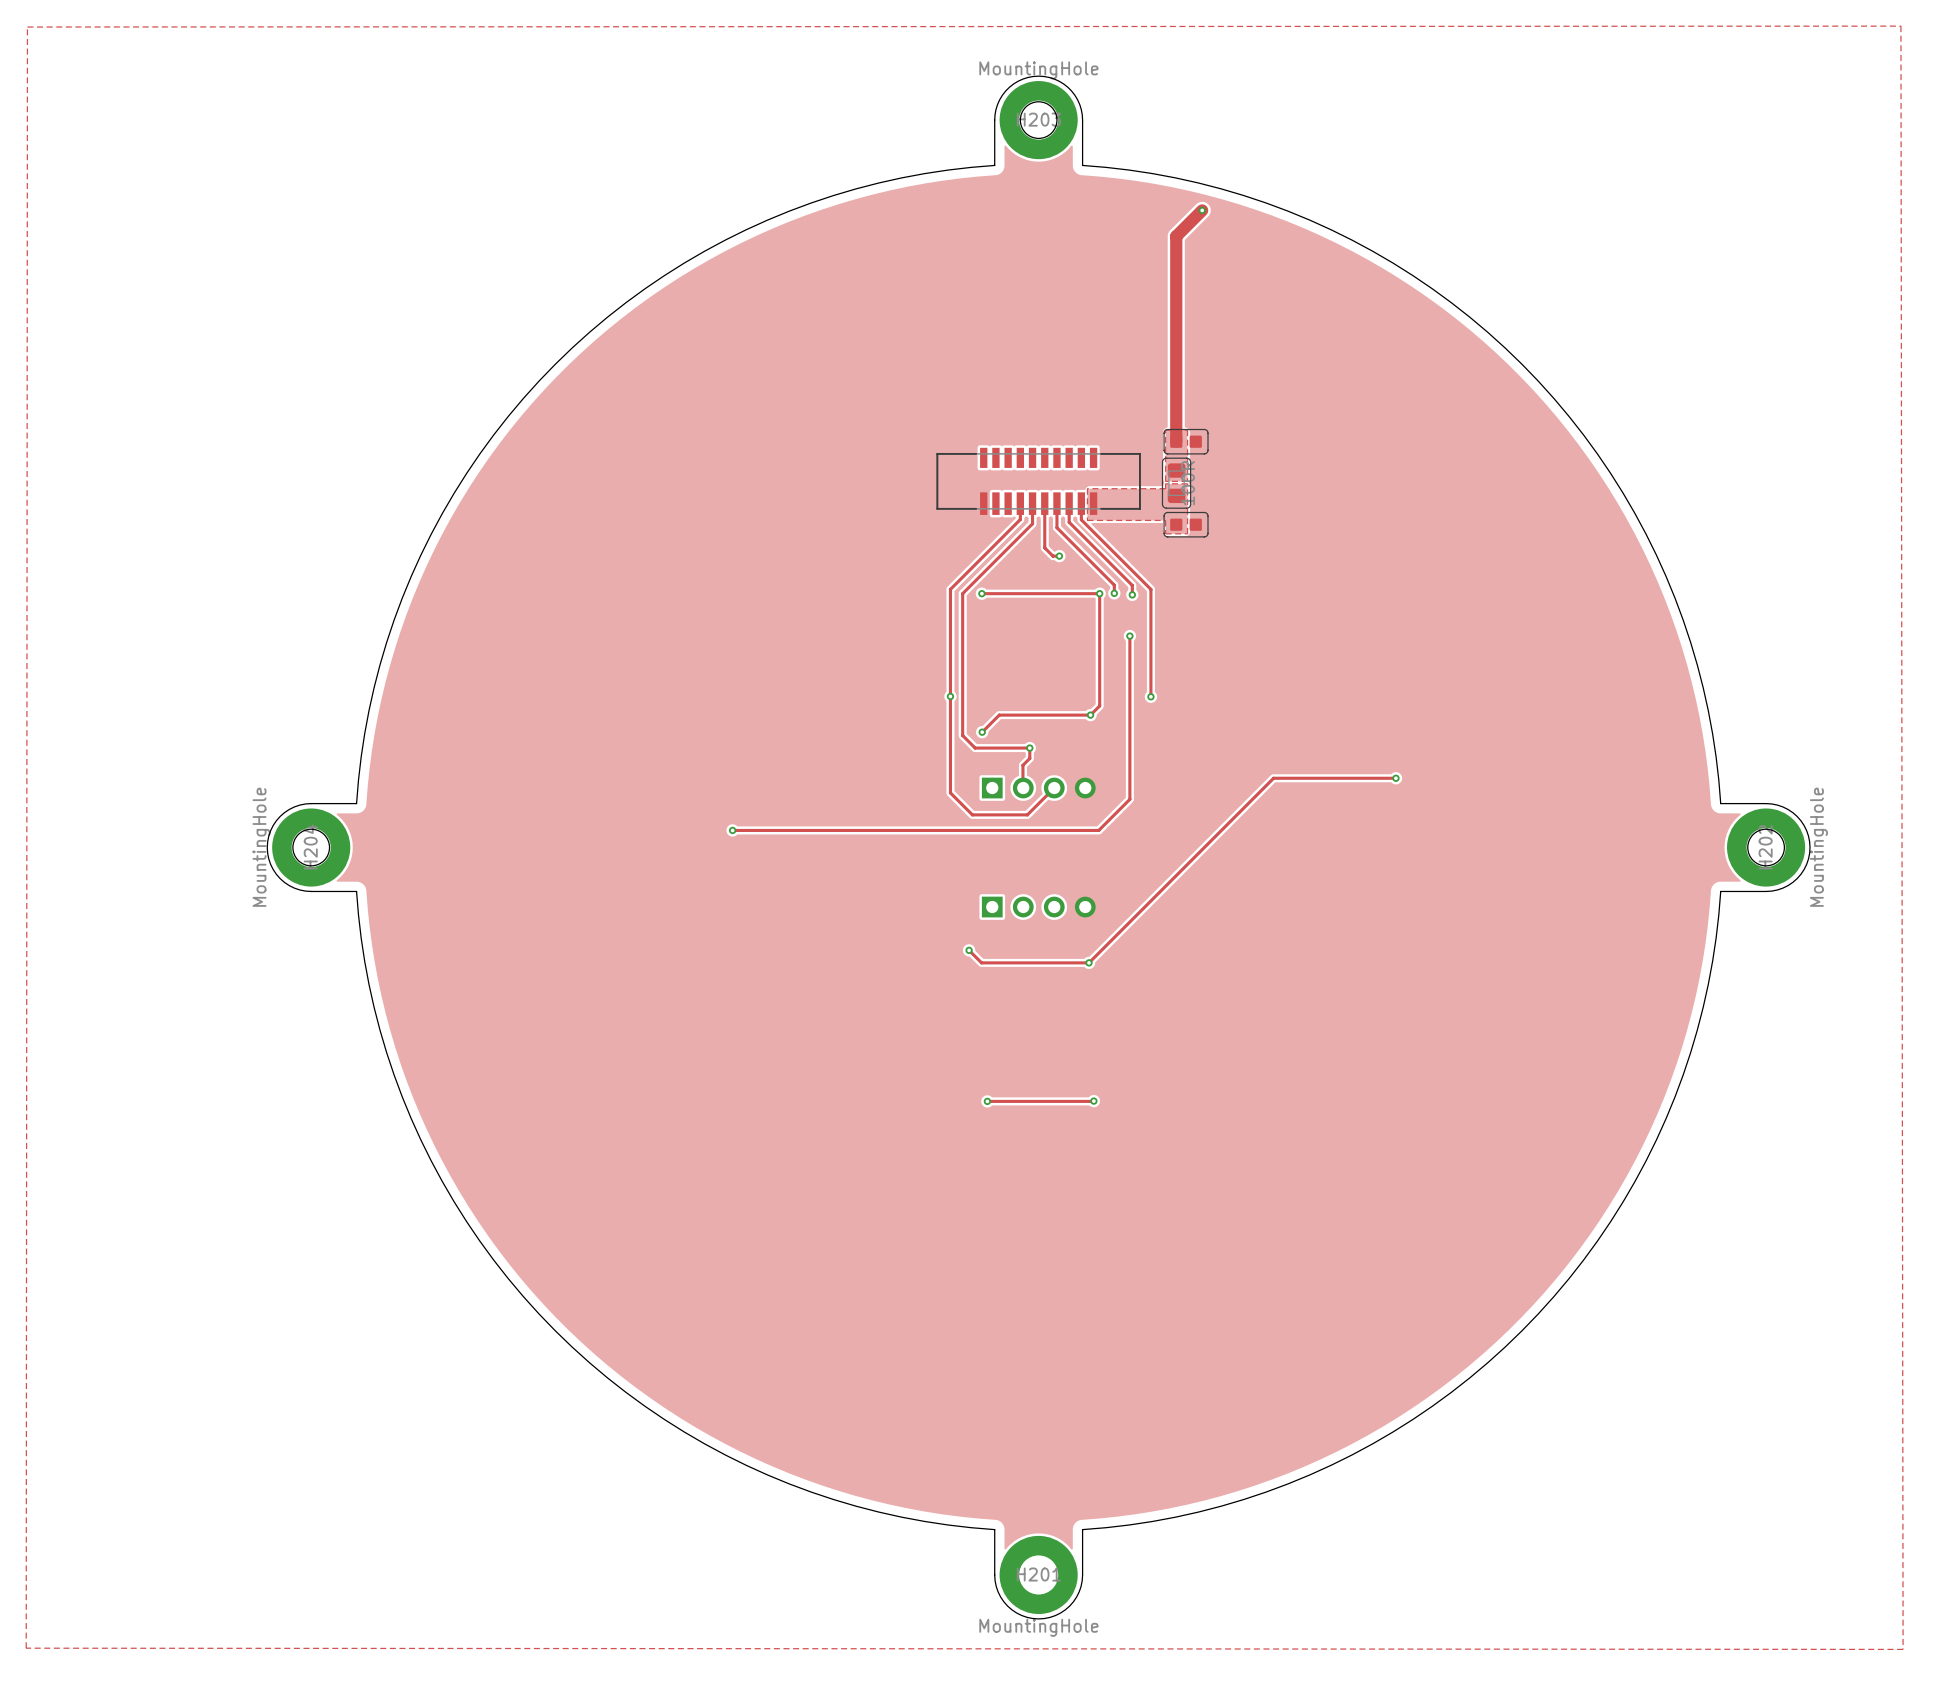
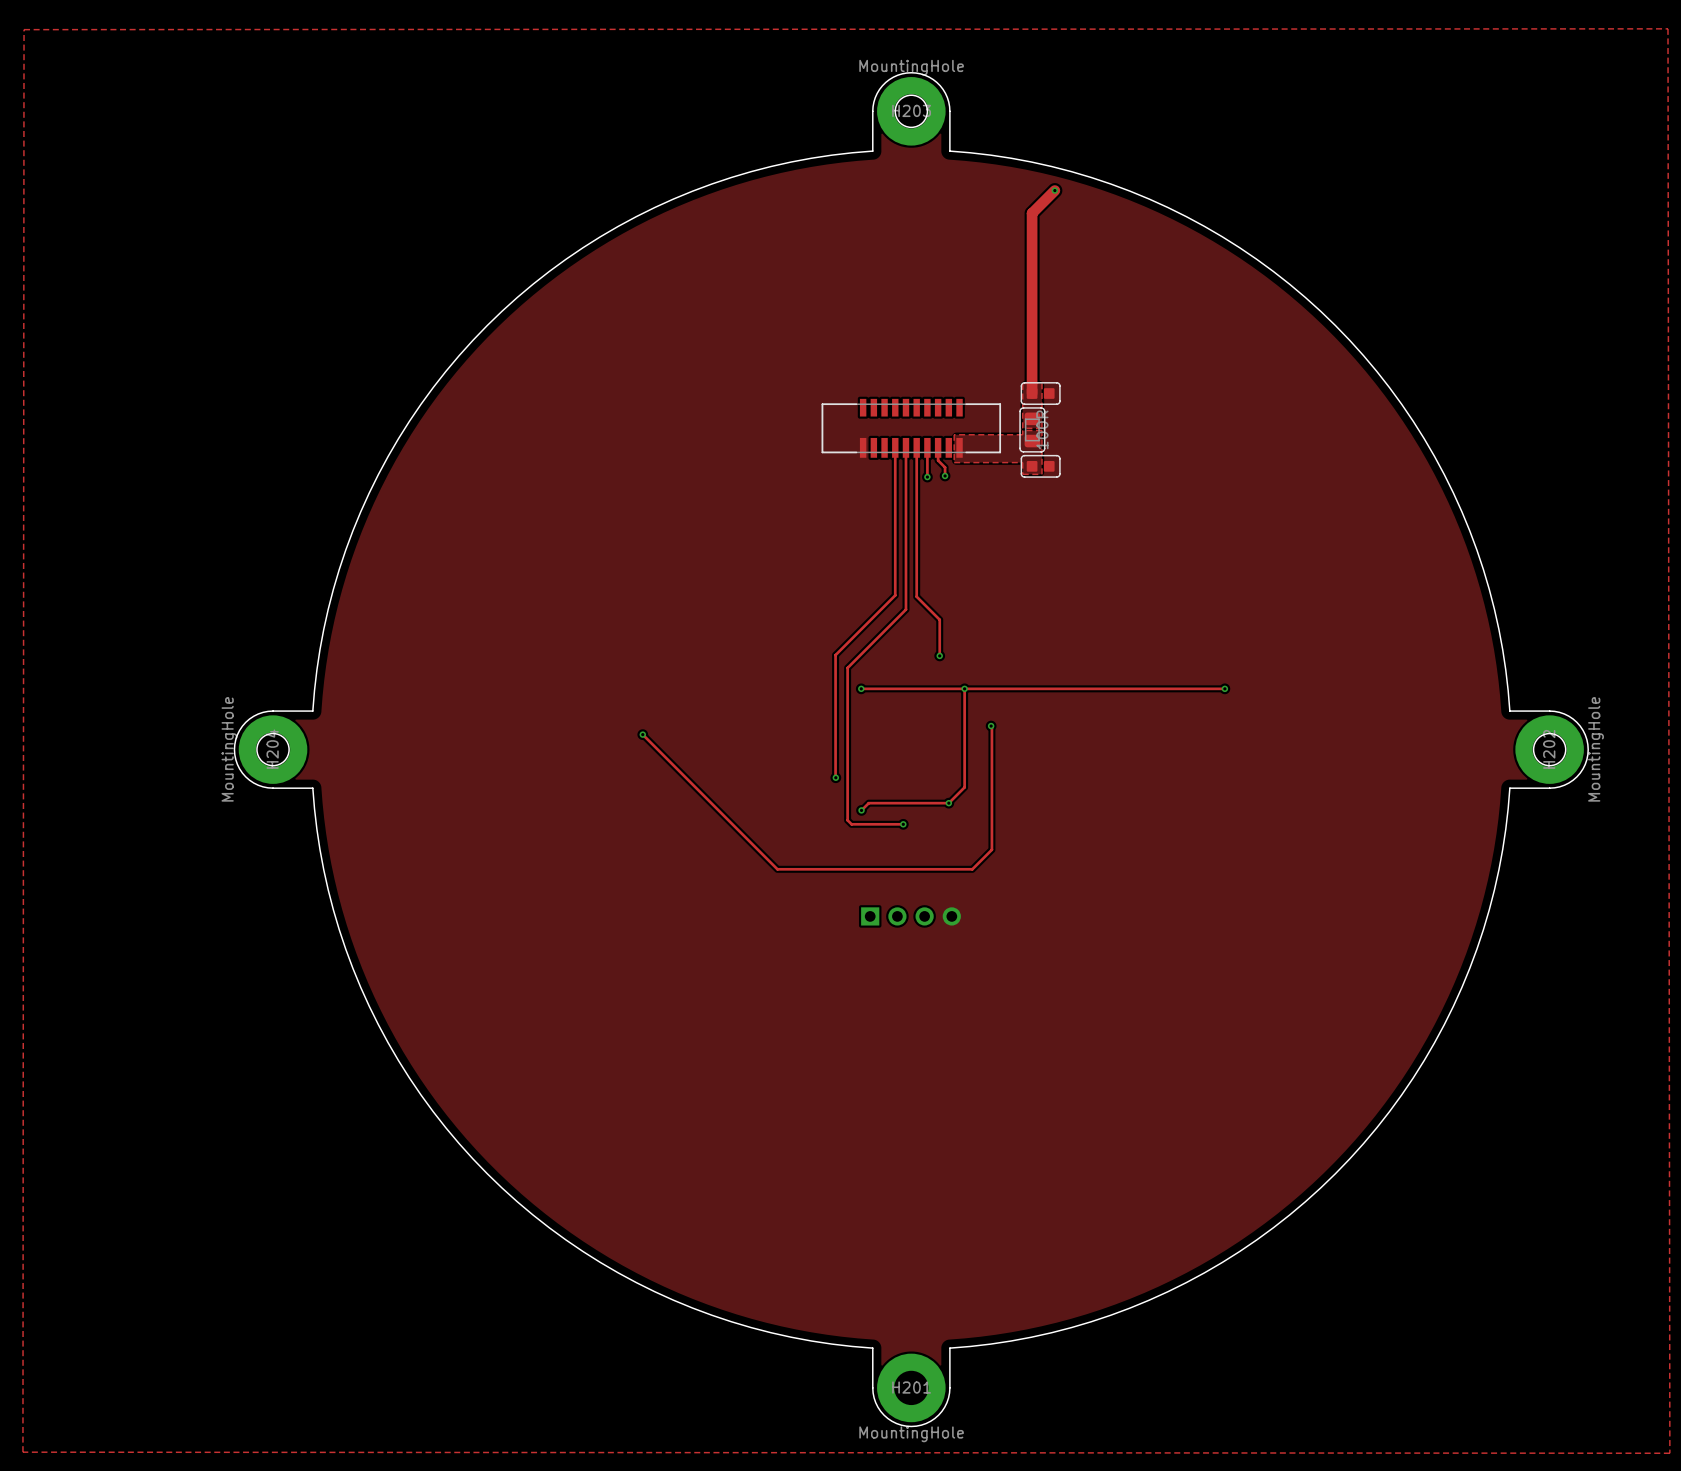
track: (1081, 503) (1081, 519) (1150, 589) (1150, 696) -> none
track: (1069, 518) (1069, 522) (1132, 585) (1132, 594) -> (938, 460) (945, 467) (945, 475)
track: (1020, 519) (950, 589) (950, 792) (972, 814) (1027, 814) (1054, 788) -> (895, 461) (895, 595) (835, 655) (835, 777)
track: (1032, 523) (962, 593) (962, 735) (975, 748) (1029, 748) (1029, 758) (1022, 765) (1022, 788) -> (905, 465) (905, 609) (847, 667) (847, 820) (851, 824) (903, 824)
track: (1056, 527) (1114, 585) (1114, 593) -> (927, 469) (927, 477)
via: none -> (945, 475)
via: none -> (927, 477)
track: (1044, 547) (1052, 556) (1059, 556) -> (916, 486) (916, 596) (939, 619) (939, 655)
via: (1059, 556) -> none
track: (981, 593) (1099, 593) (1099, 705) (1090, 715) (999, 715) (982, 732) -> none
via: (981, 593) -> none
via: (1099, 593) -> none
via: (1114, 593) -> none
via: (1132, 594) -> none
via: (1129, 636) -> none
track: (1130, 636) (1129, 799) (1098, 830) (732, 830) -> (991, 726) (991, 849) (972, 869) (777, 869) (642, 734)
via: (950, 696) -> none
via: (1150, 696) -> none
via: (1090, 715) -> none
via: (982, 732) -> none
via: none -> (939, 655)
via: (1029, 748) -> none
via: none -> (861, 688)
track: none -> (964, 688) (964, 787) (948, 803) (868, 803) (861, 810)
via: none -> (964, 688)
track: (1273, 778) (1088, 962) (981, 962) (969, 950) -> (1117, 688) (861, 688)
part: (1038, 788) -> none
via: none -> (991, 726)
via: none -> (835, 777)
part: (1038, 907) -> none
via: none -> (948, 803)
via: none -> (861, 810)
via: none -> (903, 824)
via: (969, 950) -> none
via: (1088, 962) -> none
part: none -> (911, 916)
via: (987, 1101) -> none
track: (1093, 1101) (987, 1101) -> none
via: (1093, 1101) -> none

